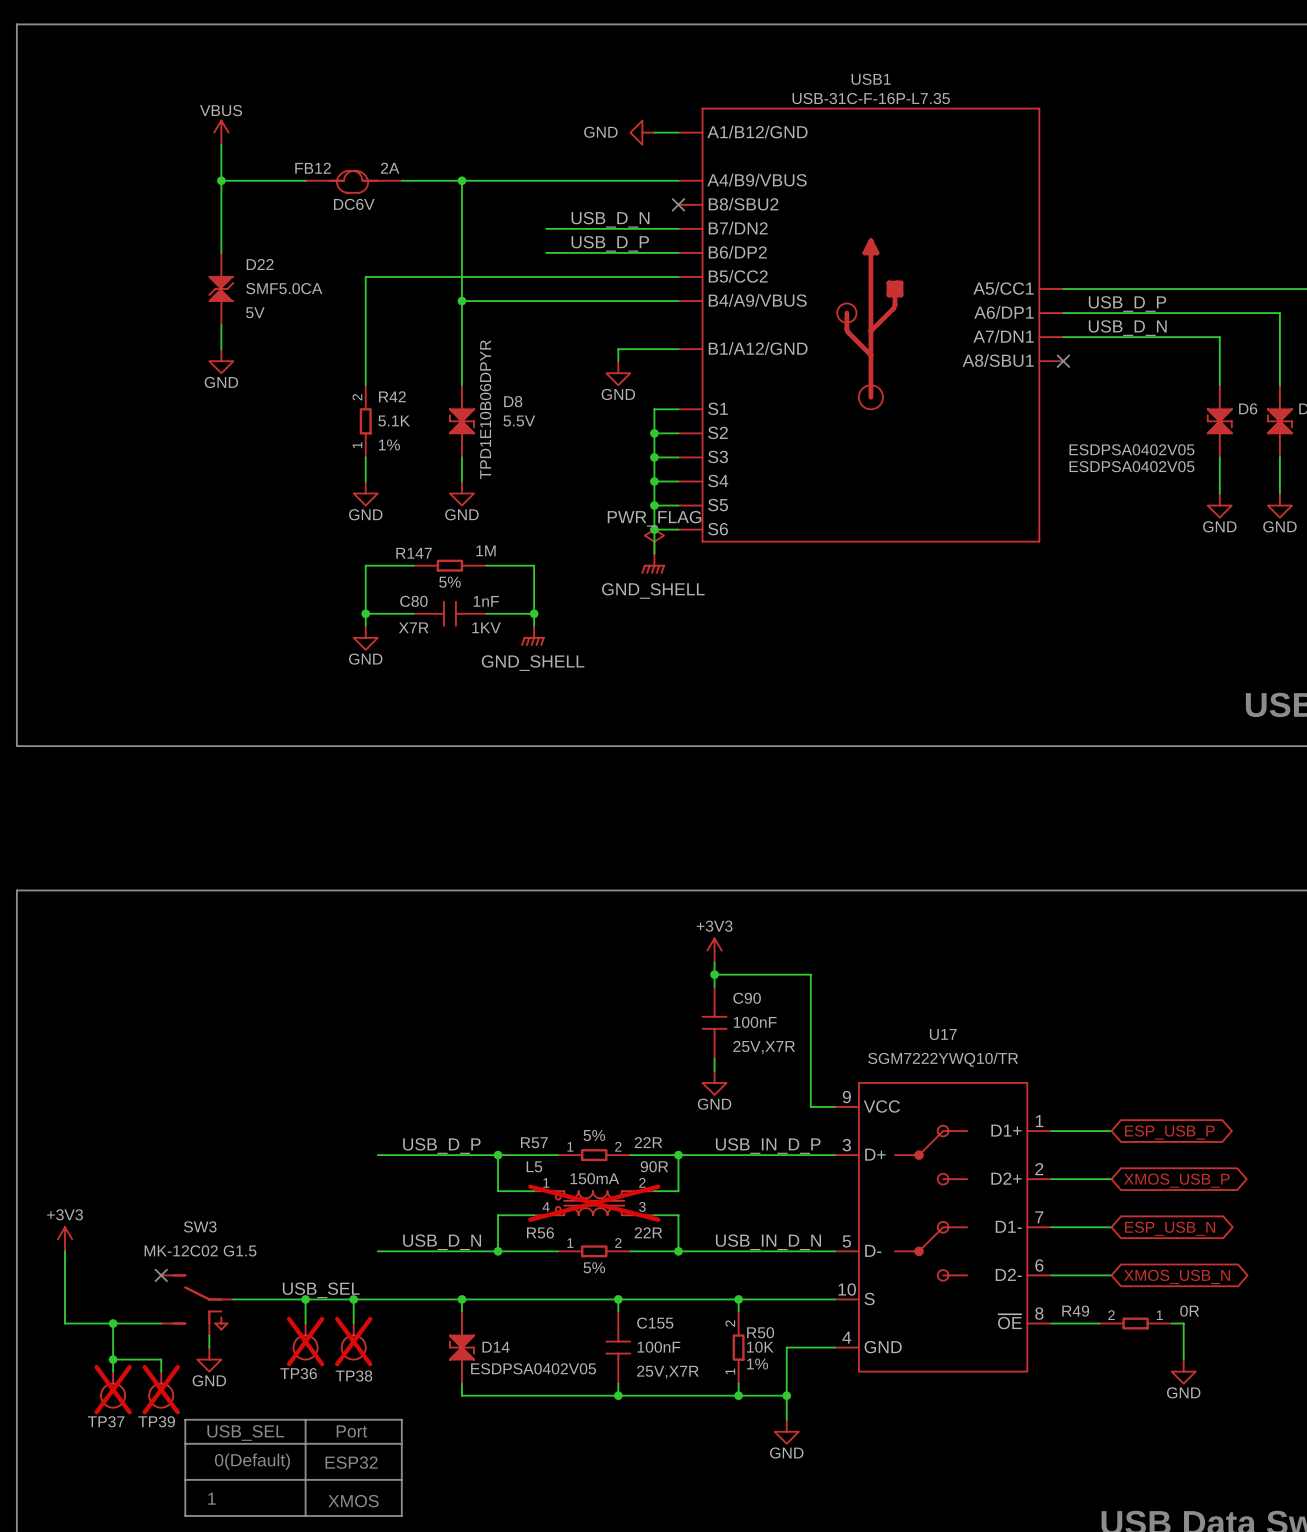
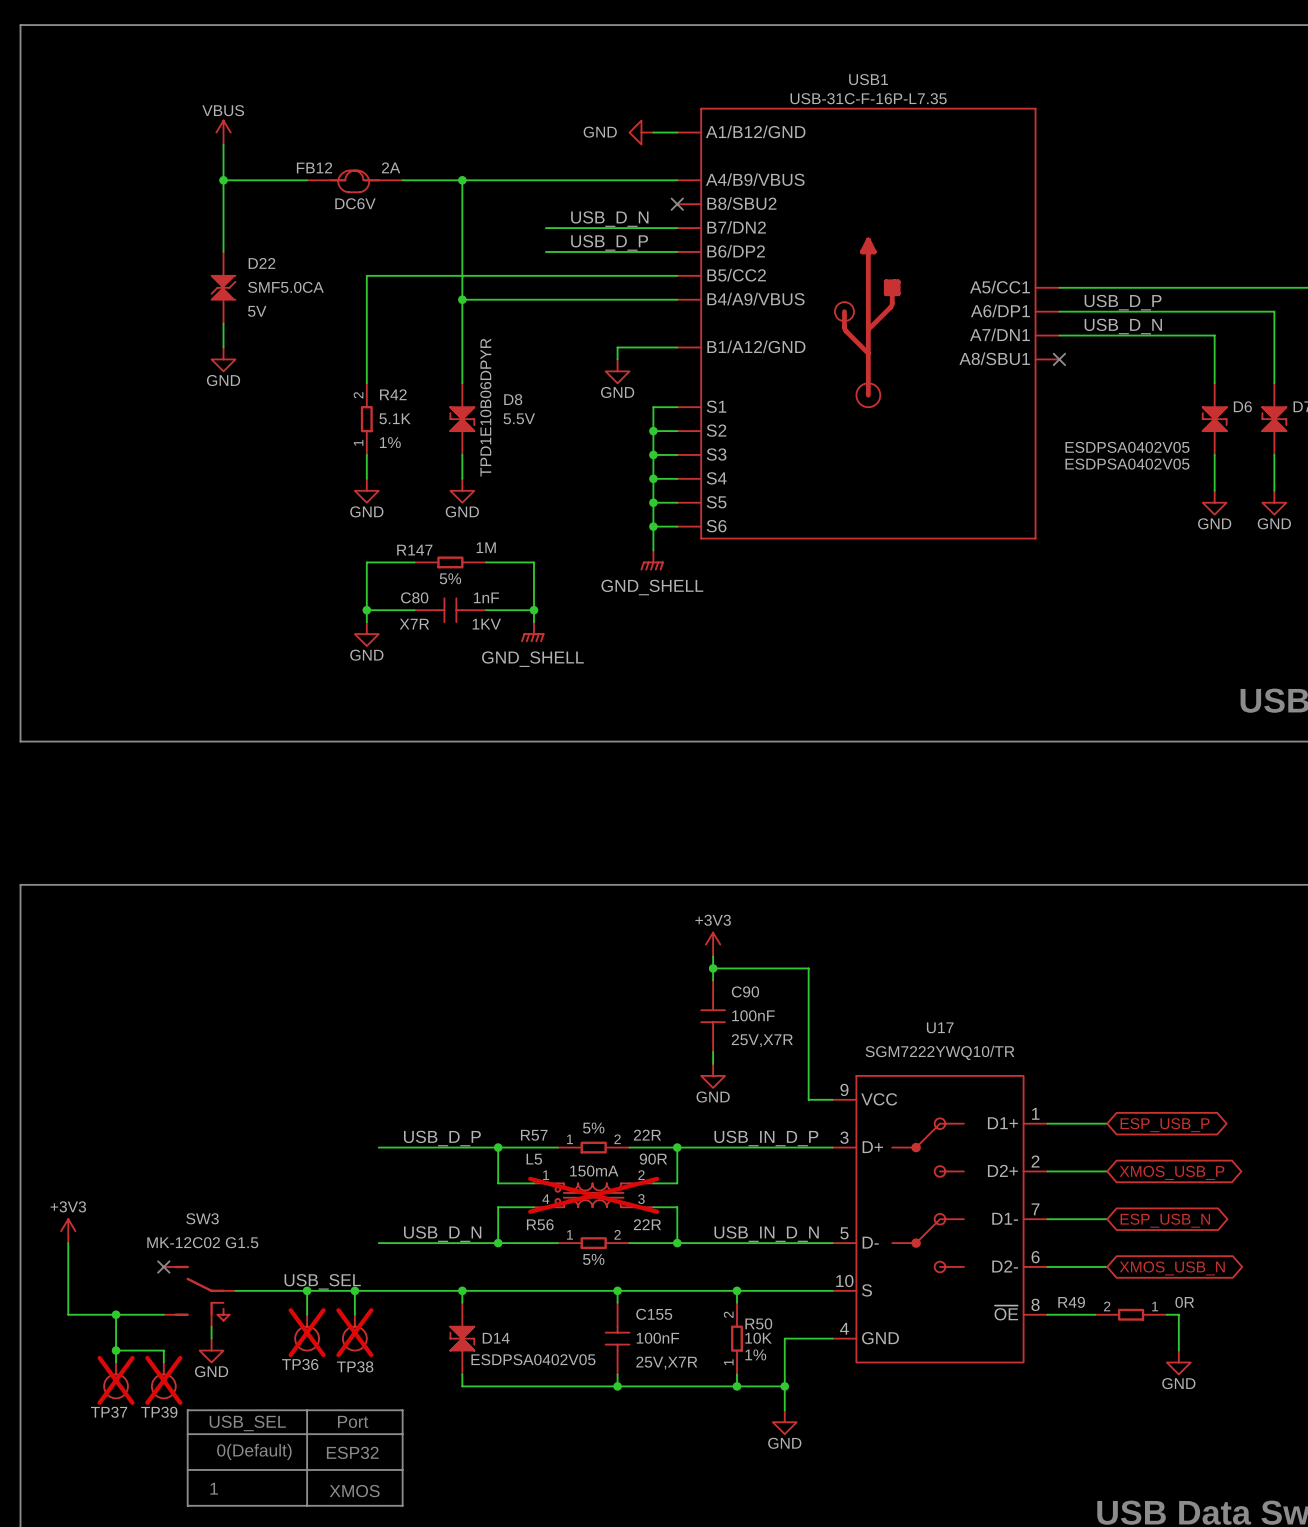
power symbol: PWR_FLAG (654, 541) -> none

